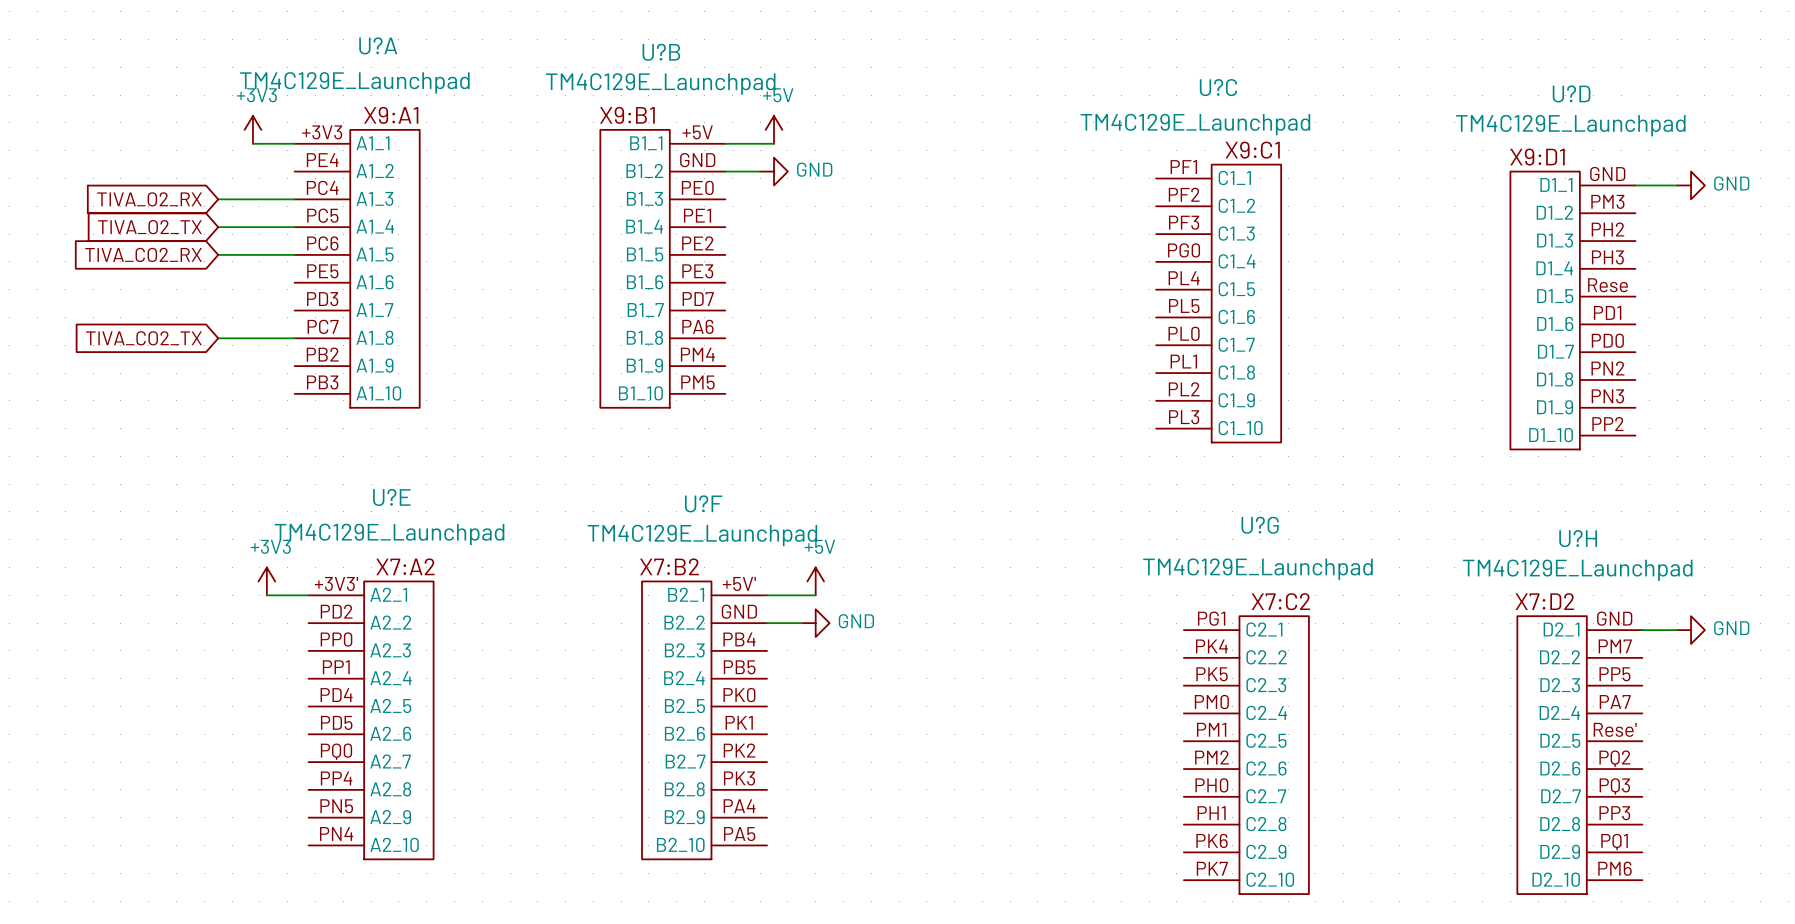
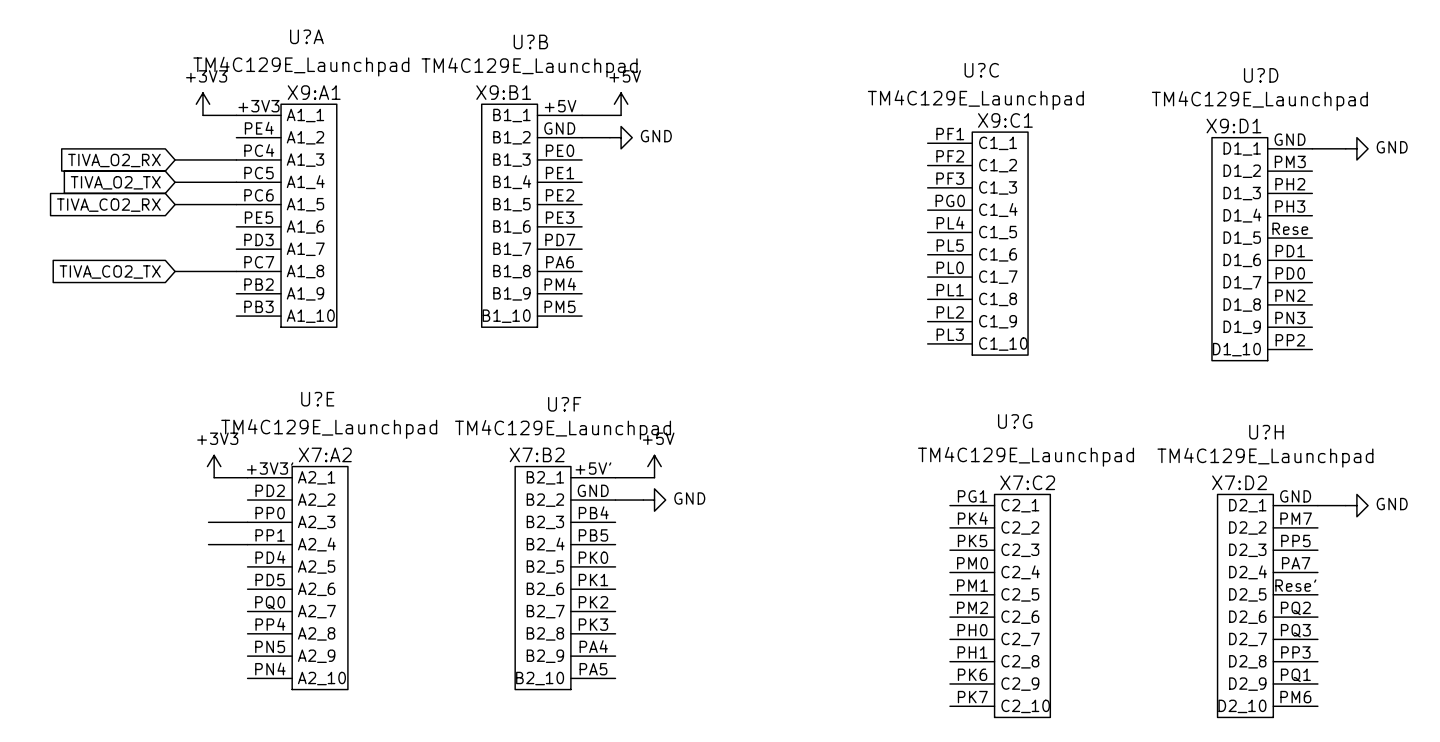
wire: none -> (208, 522) (247, 522)
wire: none -> (208, 544) (247, 544)

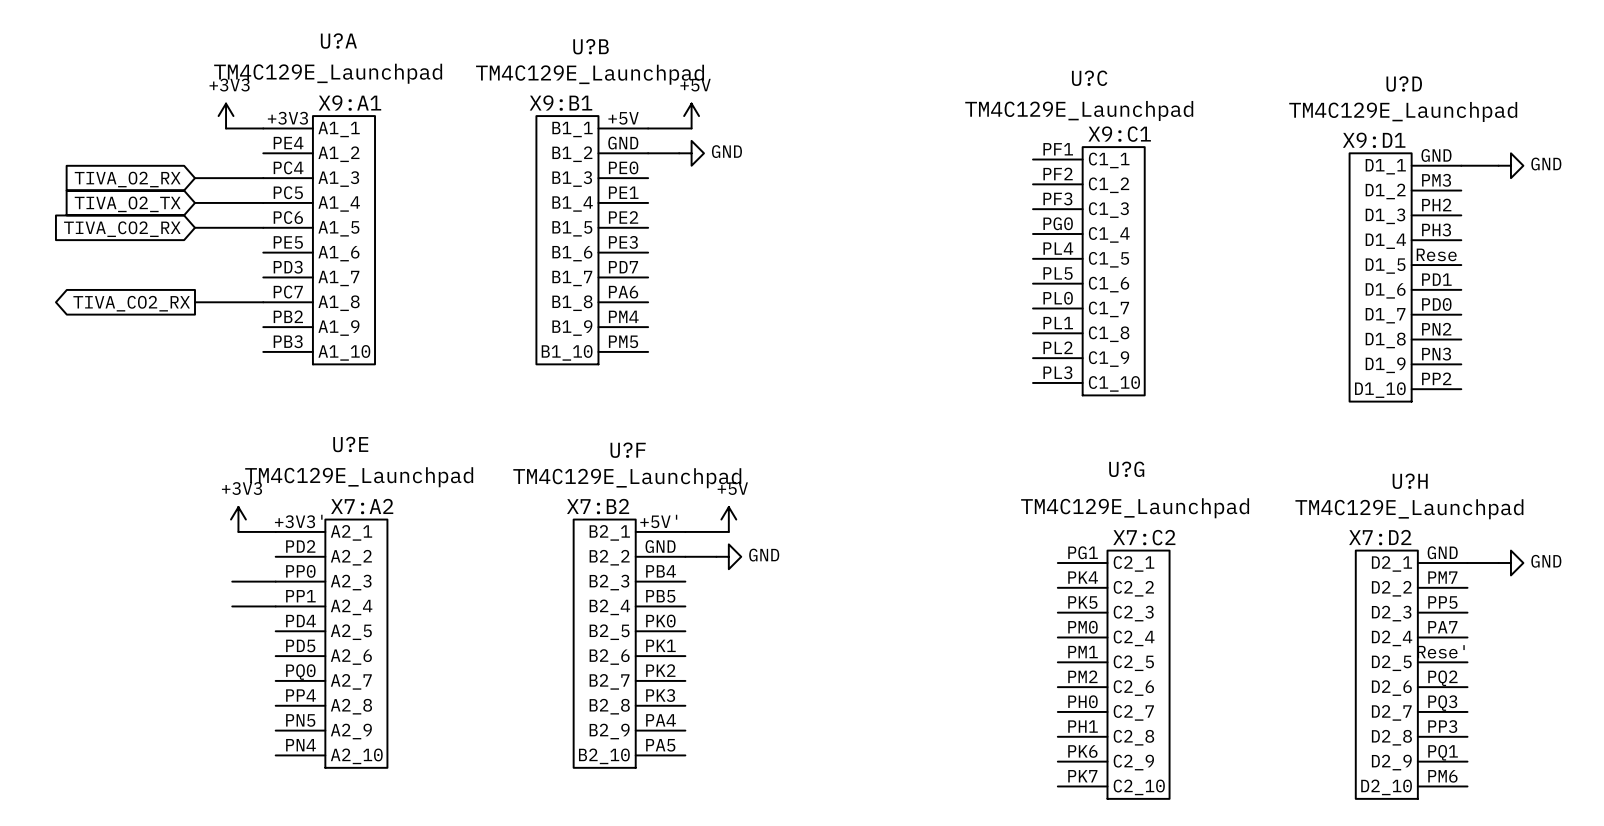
global label shape: input (110, 271) -> output (131, 303)
global label: TIVA_CO2_TX (110, 271) -> TIVA_CO2_RX (131, 303)

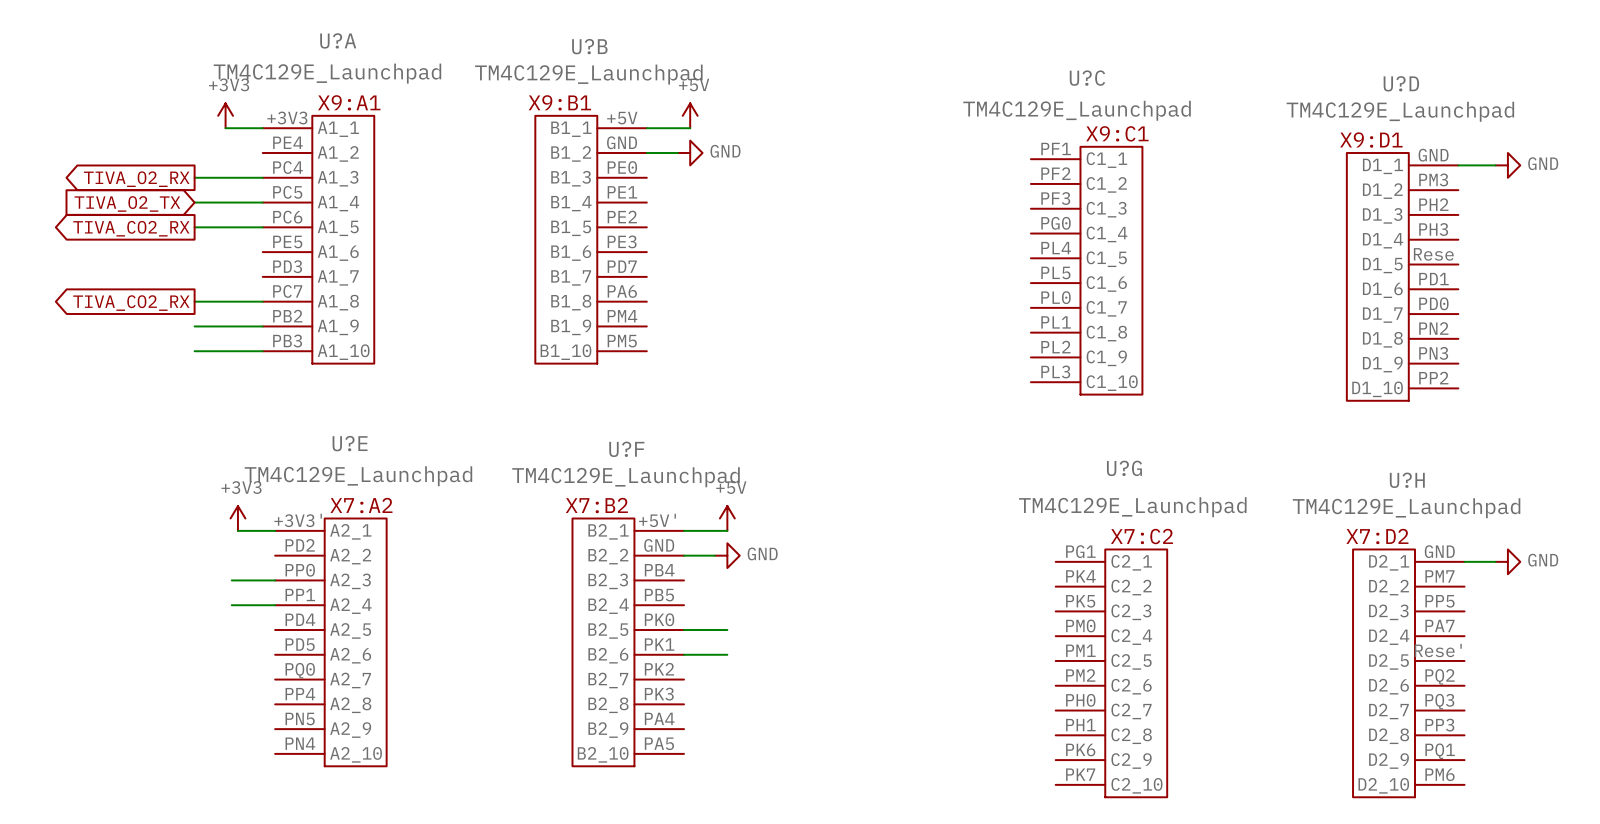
global label shape: input (127, 179) -> output (136, 179)
global label shape: input (122, 229) -> output (131, 228)
wire: none -> (194, 326) (262, 326)
wire: none -> (194, 351) (262, 351)
wire: none -> (683, 630) (727, 630)
wire: none -> (683, 654) (727, 654)

